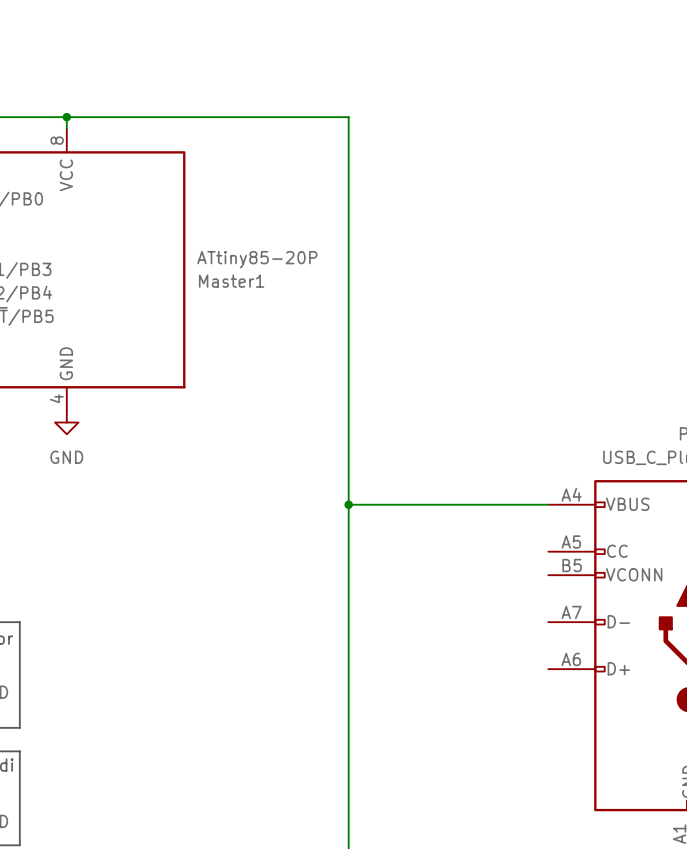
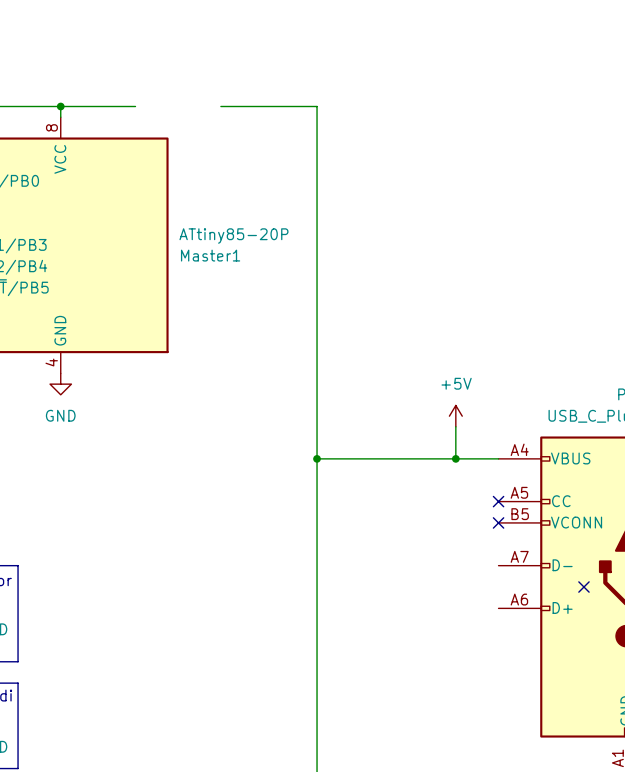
wire: (149, 117) (242, 117) -> none
power symbol: none -> +5V (455, 416)
wire: none -> (455, 426) (455, 458)
junction: none -> (455, 458)
no-connect mark: none -> (498, 501)
no-connect mark: none -> (498, 522)
no-connect mark: none -> (583, 587)

